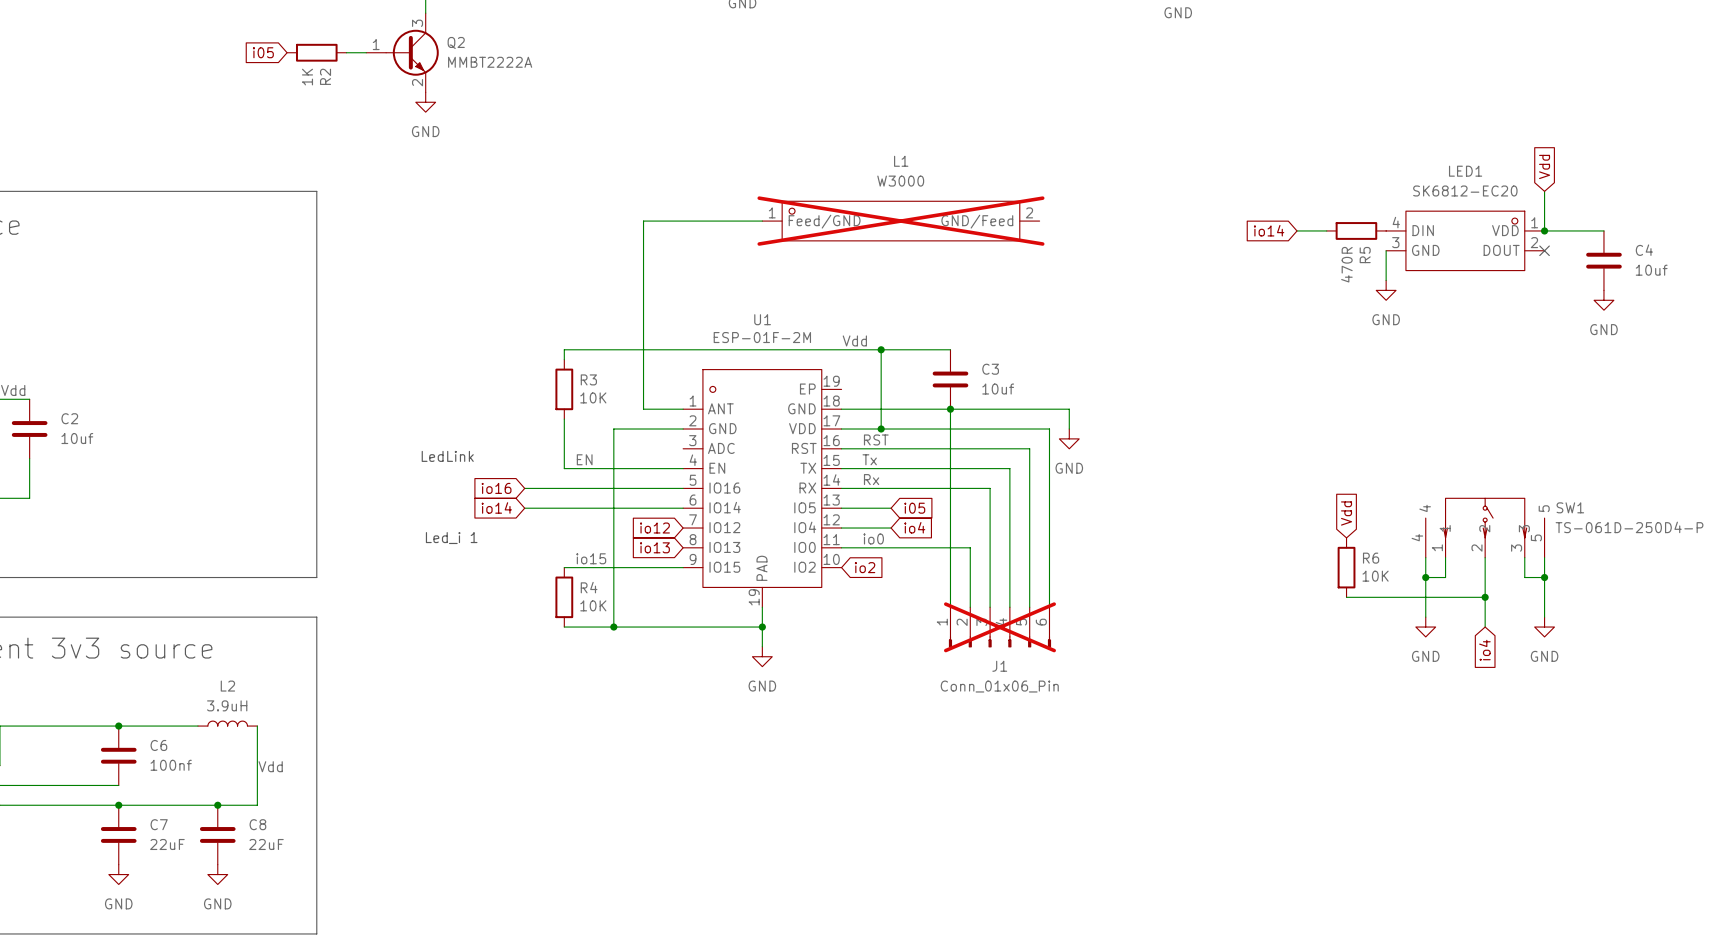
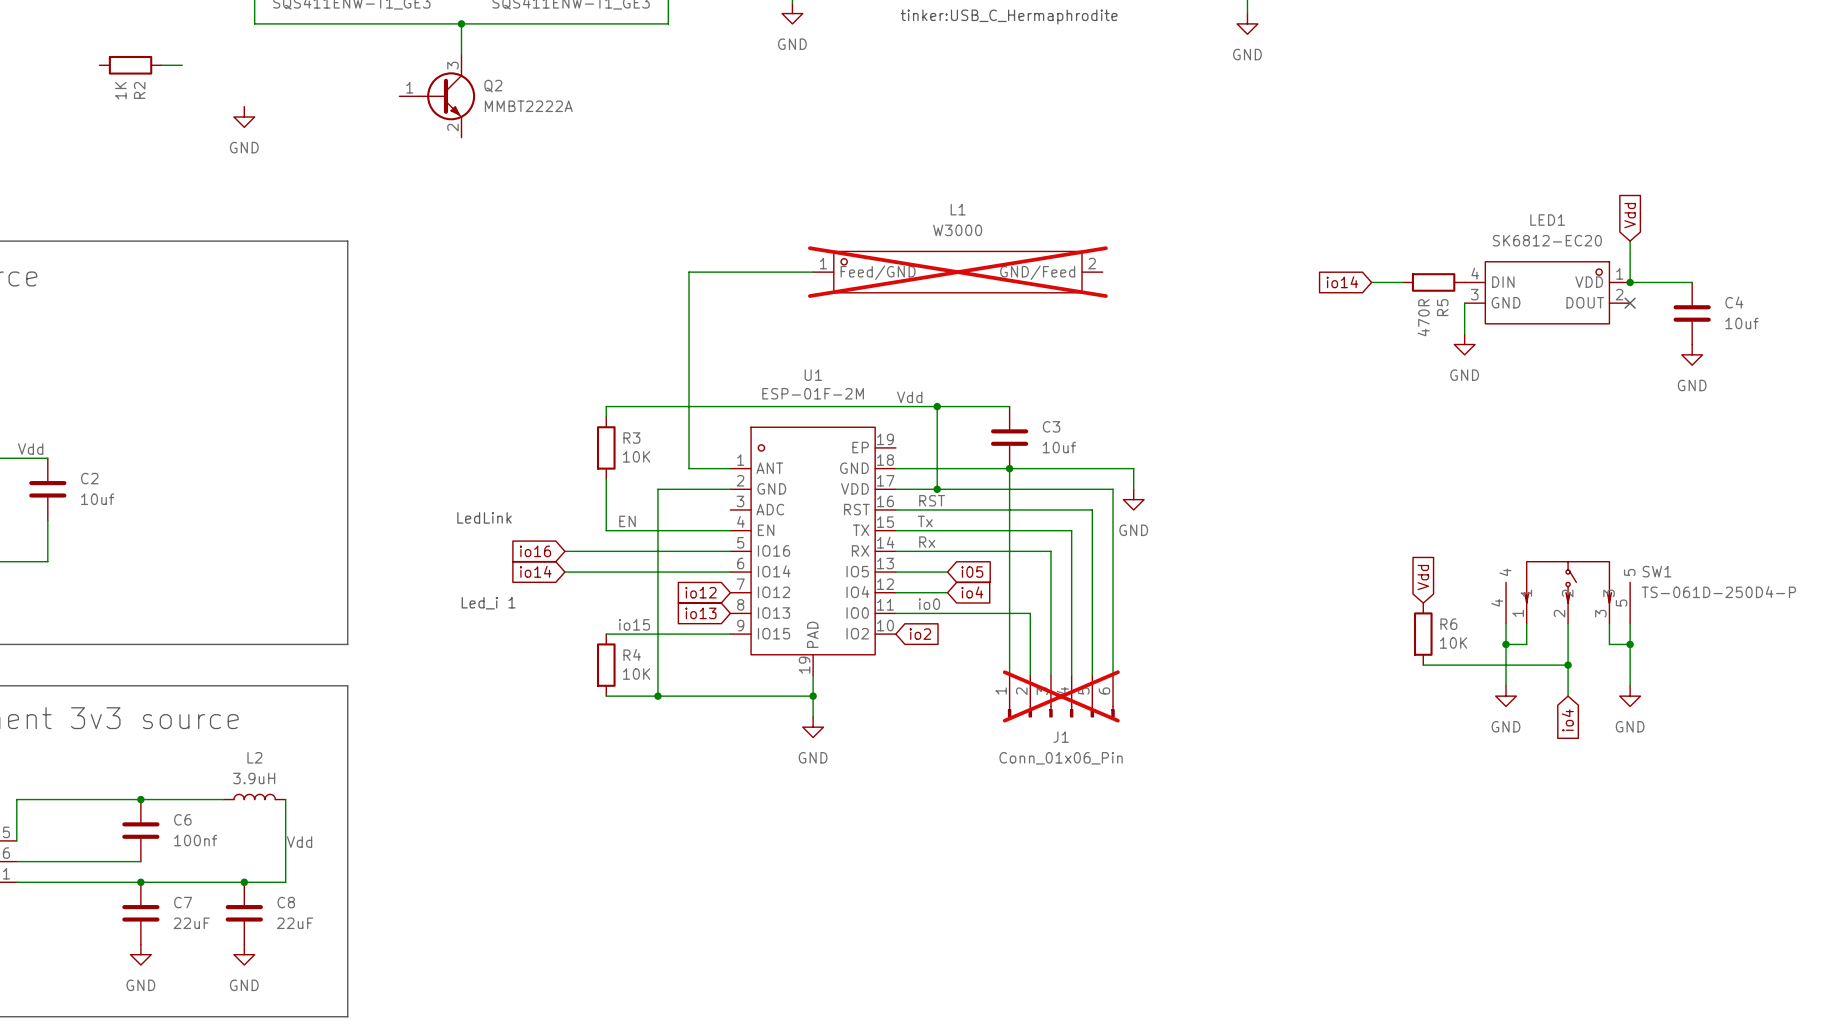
wire: none -> (161, 65) (182, 65)
global label: i05 (263, 52) -> none
R2 position: (316, 52) -> (130, 65)
wire: (346, 52) (366, 52) -> none
power symbol: none -> GND (244, 116)
power symbol: GND (425, 102) -> none

